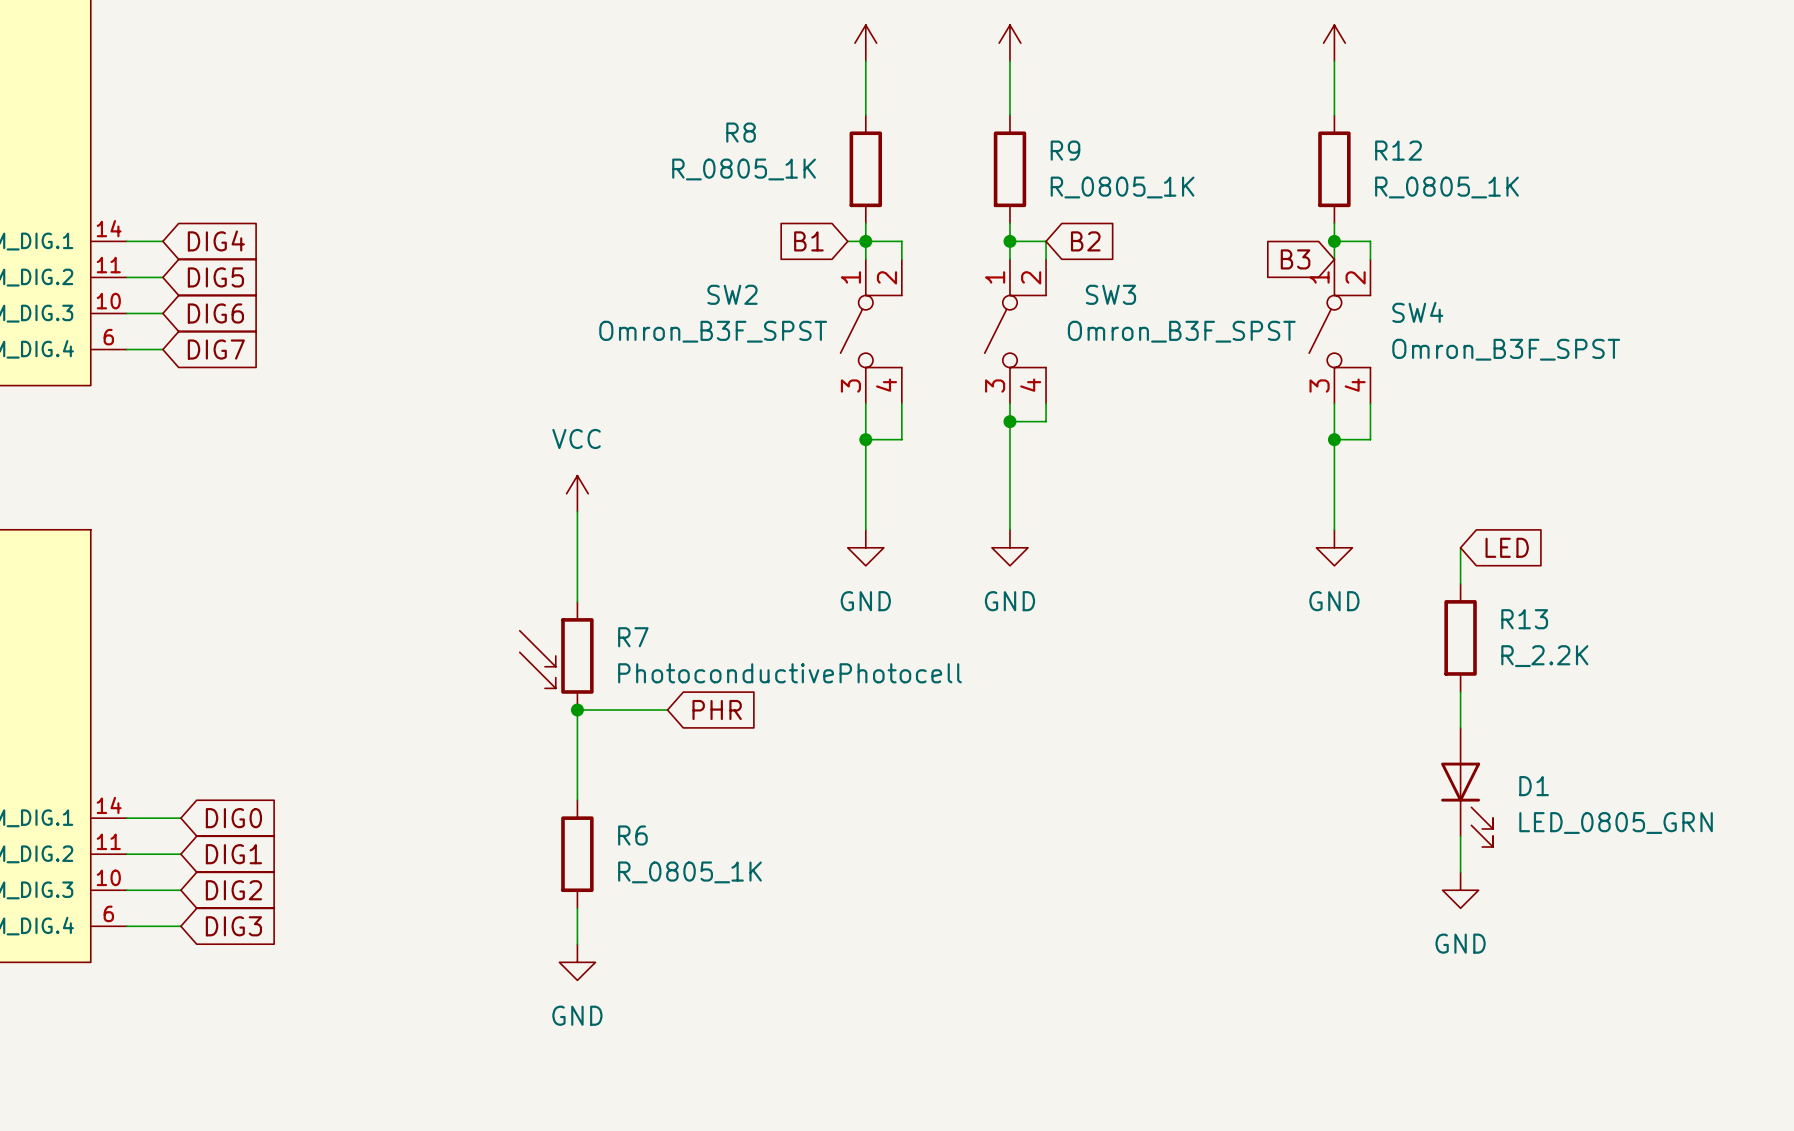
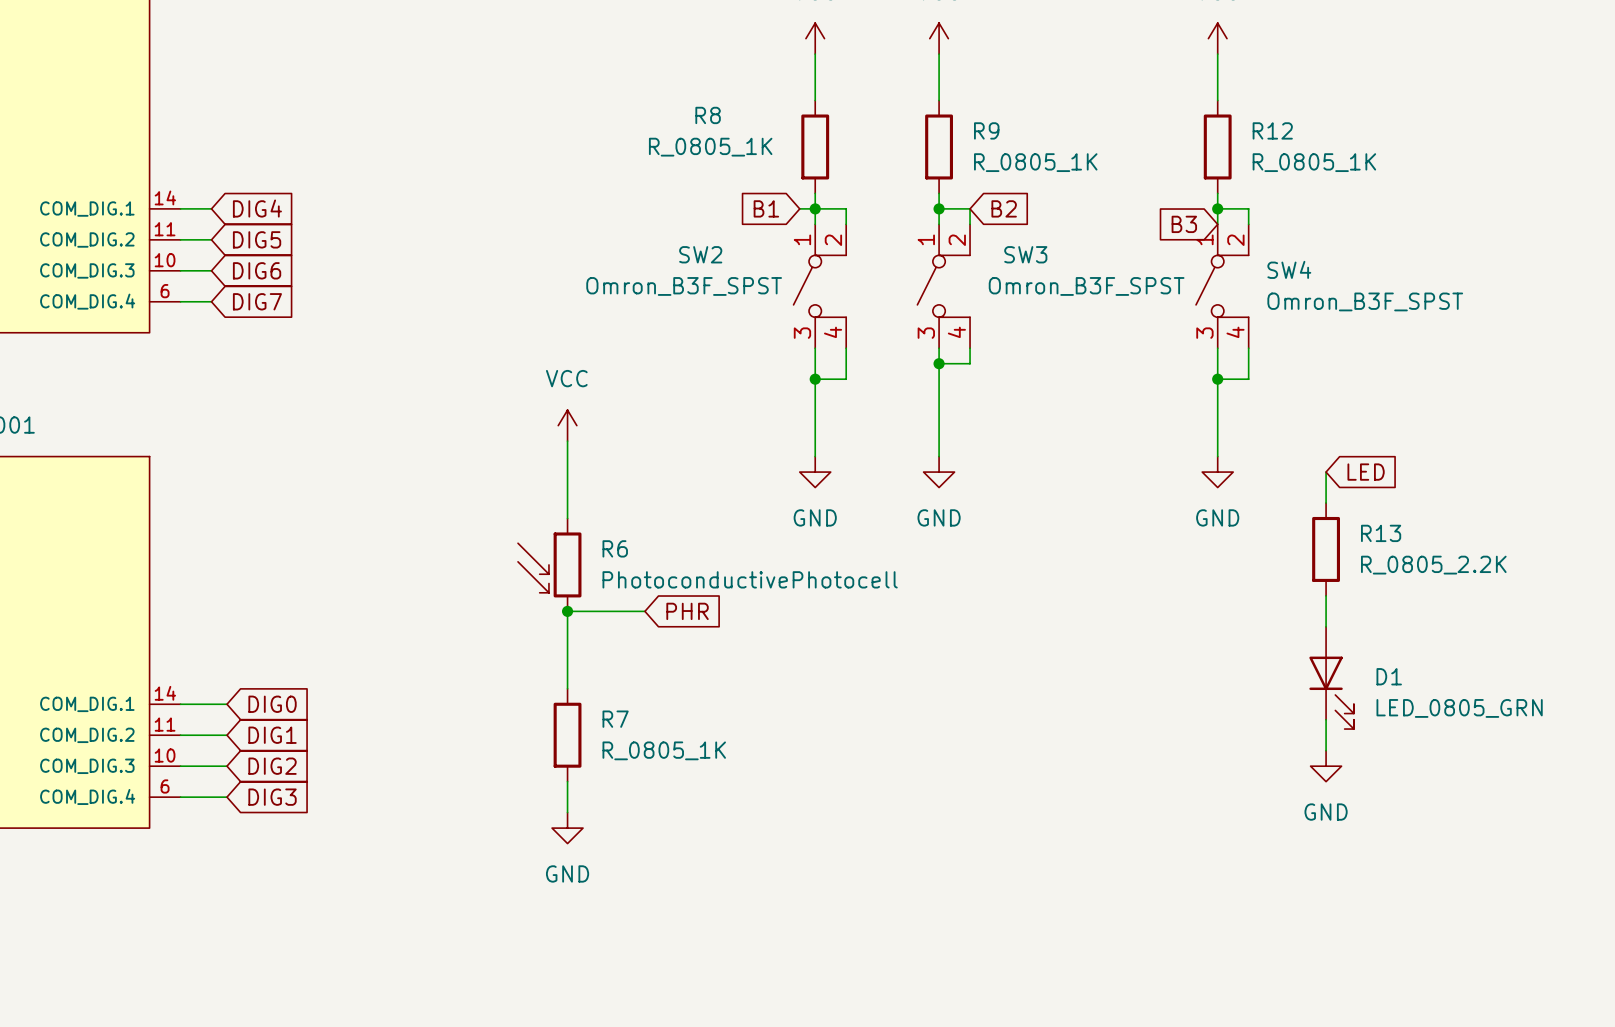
R7 name: R7 (633, 637) -> R6 (615, 548)
R13 value: R_2.2K (1544, 656) -> R_0805_2.2K (1433, 565)
R6 name: R6 (632, 835) -> R7 (615, 719)

